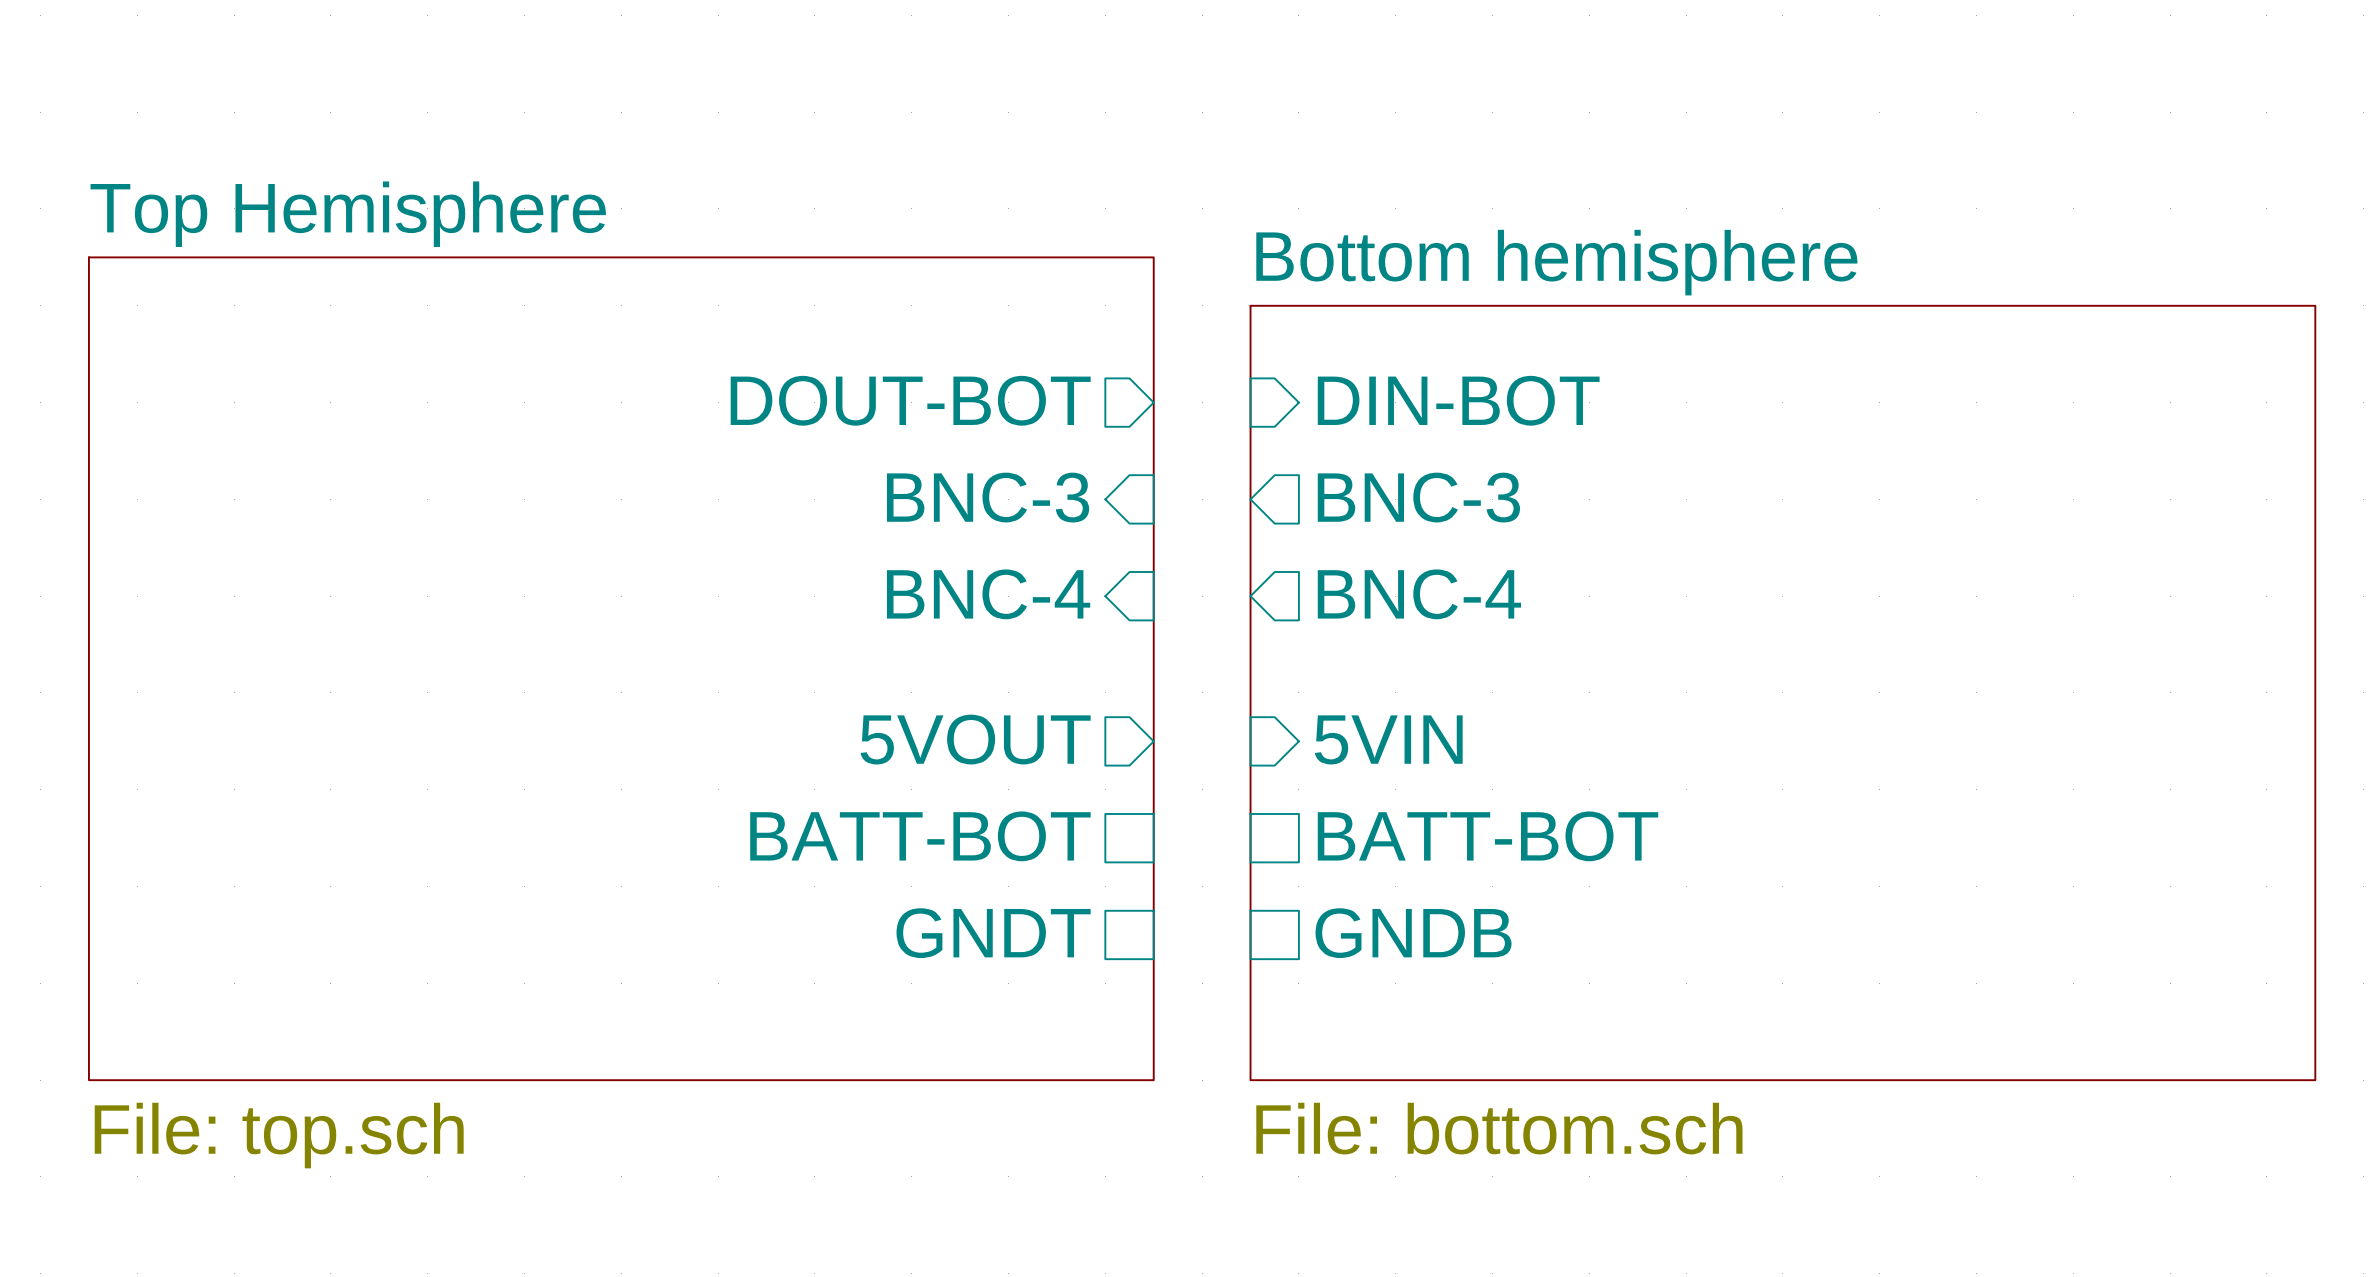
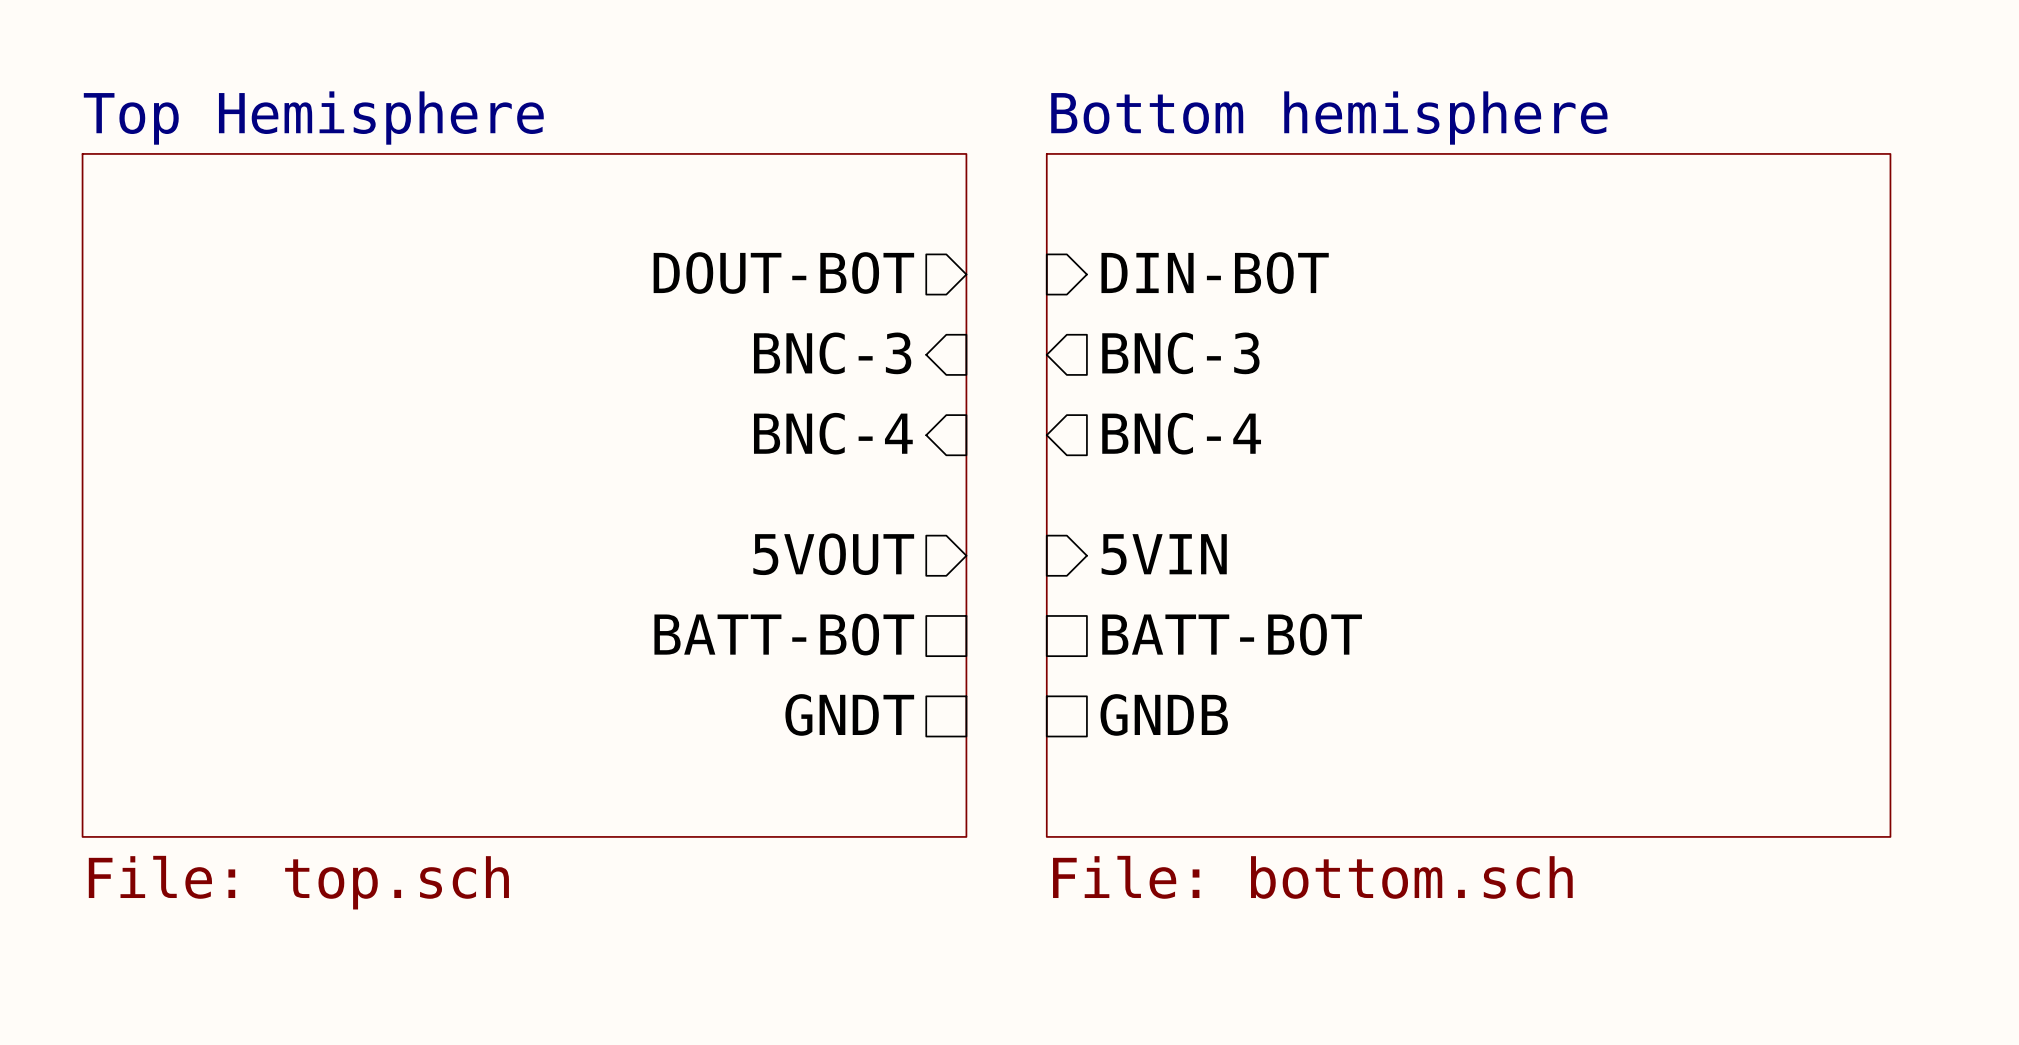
sheet Bottom hemisphere shape: [1250, 305, 2316, 1081] -> [1046, 153, 1891, 837]

